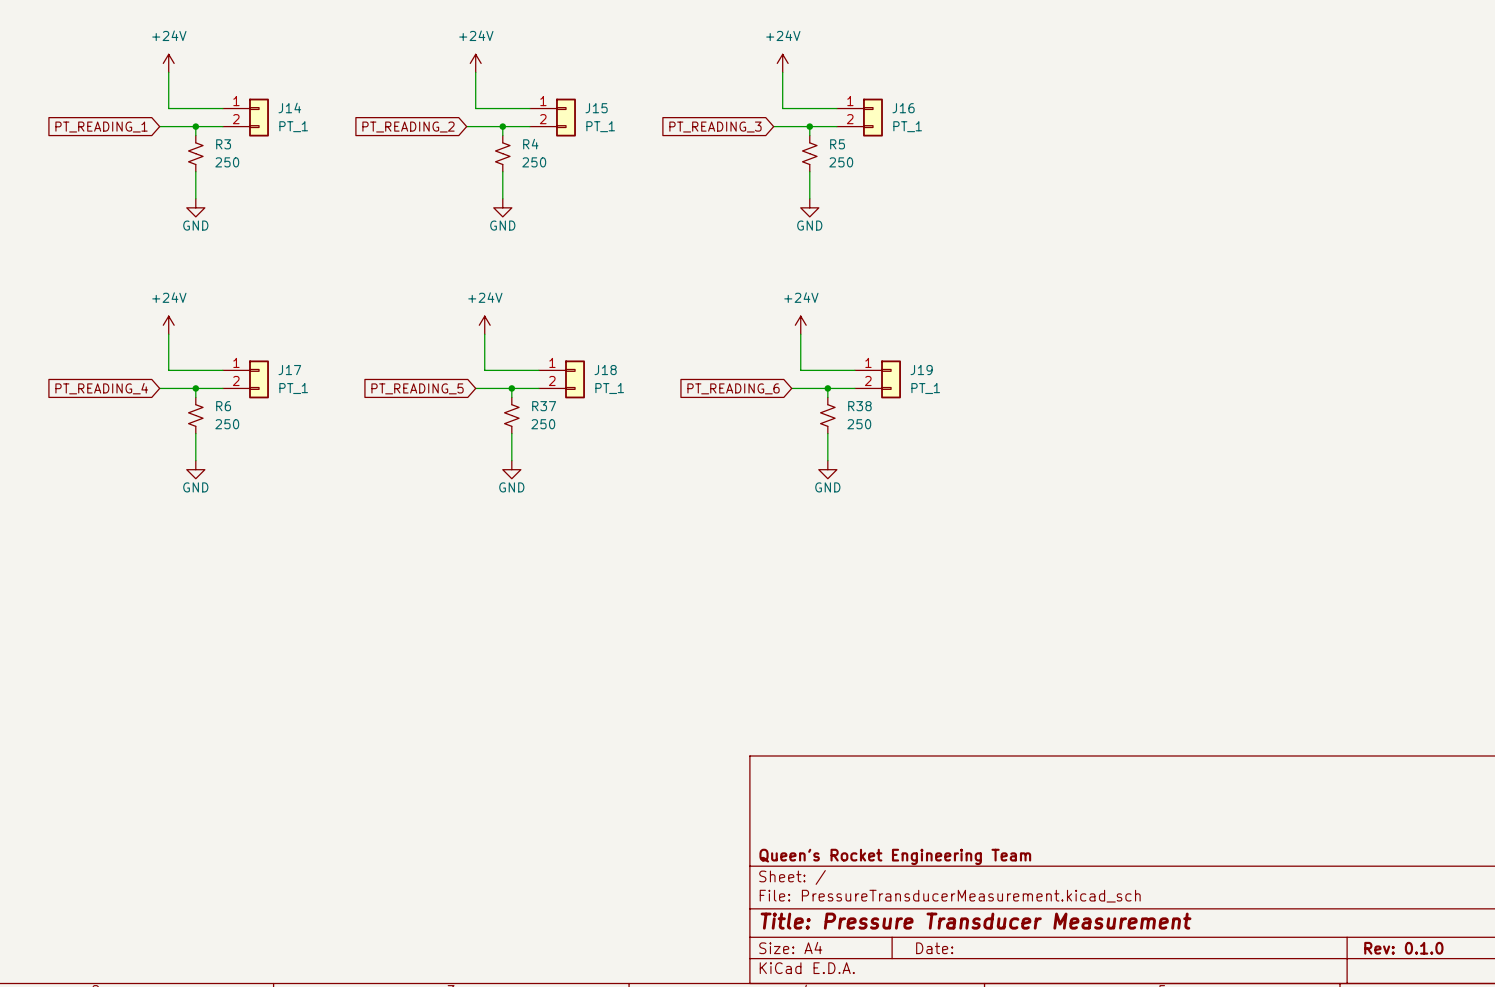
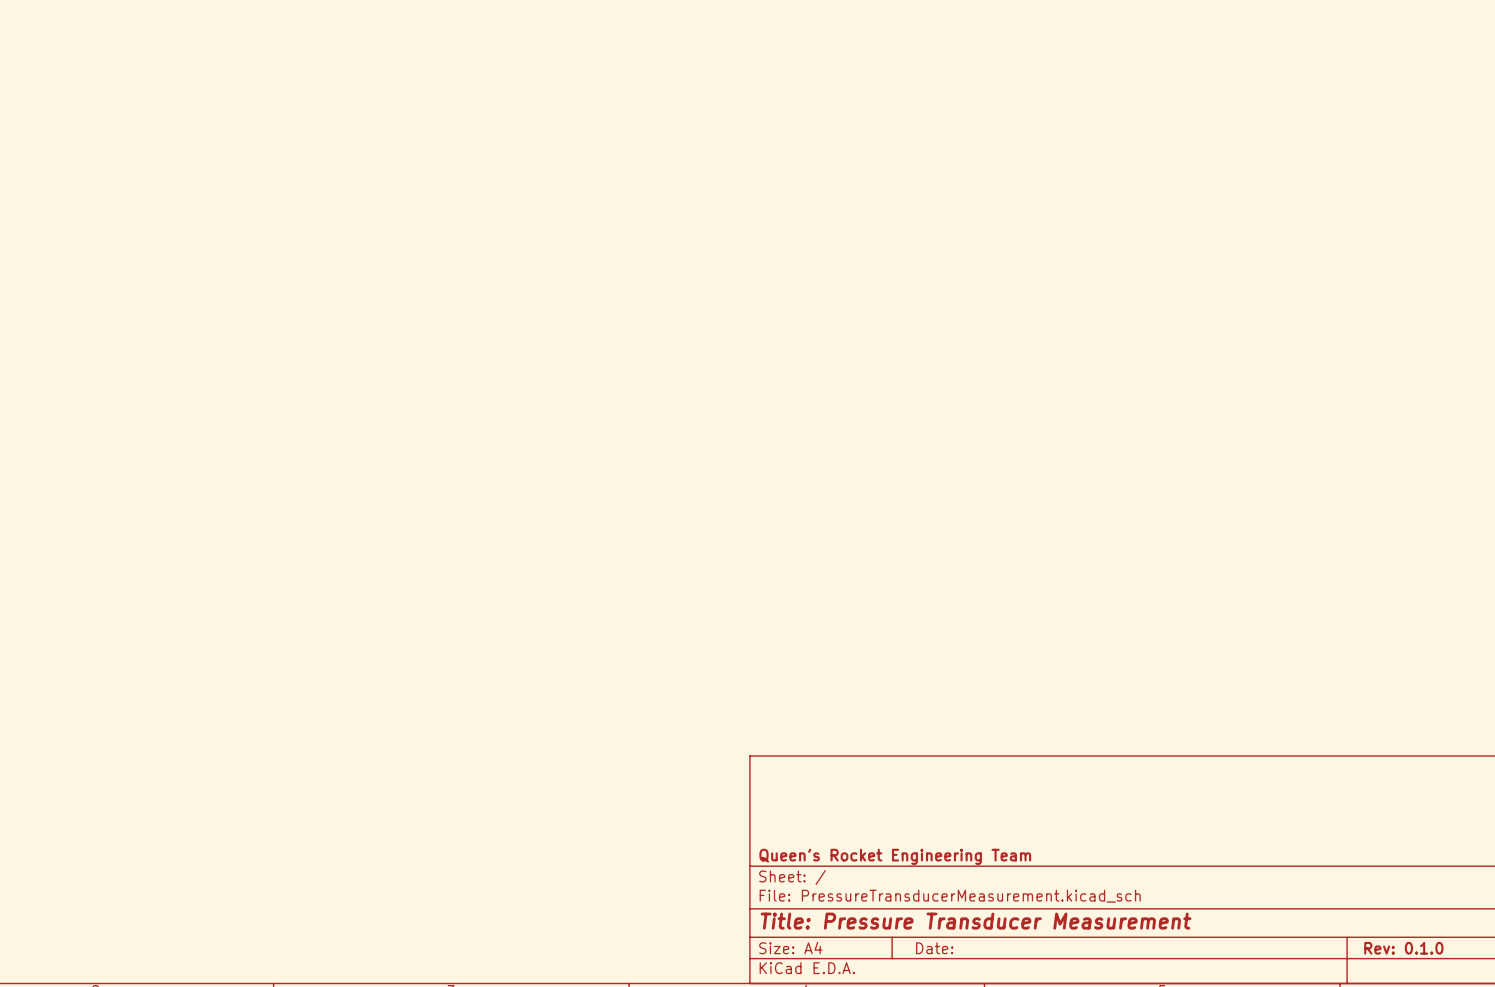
power symbol: +24V (168, 63) -> none
power symbol: +24V (475, 63) -> none
power symbol: +24V (782, 63) -> none
wire: (168, 72) (168, 108) (222, 108) -> none
wire: (475, 72) (475, 108) (529, 108) -> none
wire: (782, 72) (782, 108) (836, 108) -> none
J14: PT_1 (245, 117) -> none
J15: PT_1 (552, 117) -> none
J16: PT_1 (859, 117) -> none
wire: (159, 126) (222, 126) -> none
wire: (195, 126) (195, 135) -> none
junction: (195, 126) -> none
wire: (466, 126) (529, 126) -> none
wire: (502, 126) (502, 135) -> none
junction: (502, 126) -> none
wire: (773, 126) (836, 126) -> none
wire: (809, 126) (809, 135) -> none
junction: (809, 126) -> none
global label: PT_READING_1 (101, 127) -> none
global label: PT_READING_2 (408, 127) -> none
global label: PT_READING_3 (715, 127) -> none
R3: 250 (195, 153) -> none
R4: 250 (502, 153) -> none
R5: 250 (809, 153) -> none
wire: (195, 171) (195, 198) -> none
wire: (502, 171) (502, 198) -> none
wire: (809, 171) (809, 198) -> none
power symbol: GND (195, 207) -> none
power symbol: GND (502, 207) -> none
power symbol: GND (809, 207) -> none
power symbol: +24V (168, 325) -> none
power symbol: +24V (484, 325) -> none
power symbol: +24V (800, 325) -> none
wire: (168, 334) (168, 370) (222, 370) -> none
wire: (484, 334) (484, 370) (538, 370) -> none
wire: (800, 334) (800, 370) (854, 370) -> none
J17: PT_1 (245, 379) -> none
J18: PT_1 (561, 379) -> none
J19: PT_1 (877, 379) -> none
global label: PT_READING_4 (101, 388) -> none
wire: (159, 388) (222, 388) -> none
wire: (195, 388) (195, 397) -> none
junction: (195, 388) -> none
global label: PT_READING_5 (417, 388) -> none
wire: (475, 388) (538, 388) -> none
wire: (511, 388) (511, 397) -> none
junction: (511, 388) -> none
global label: PT_READING_6 (733, 388) -> none
wire: (791, 388) (854, 388) -> none
wire: (827, 388) (827, 397) -> none
junction: (827, 388) -> none
R6: 250 (195, 415) -> none
R37: 250 (511, 415) -> none
R38: 250 (827, 415) -> none
wire: (195, 433) (195, 460) -> none
wire: (511, 433) (511, 460) -> none
wire: (827, 433) (827, 460) -> none
power symbol: GND (195, 469) -> none
power symbol: GND (511, 469) -> none
power symbol: GND (827, 469) -> none

